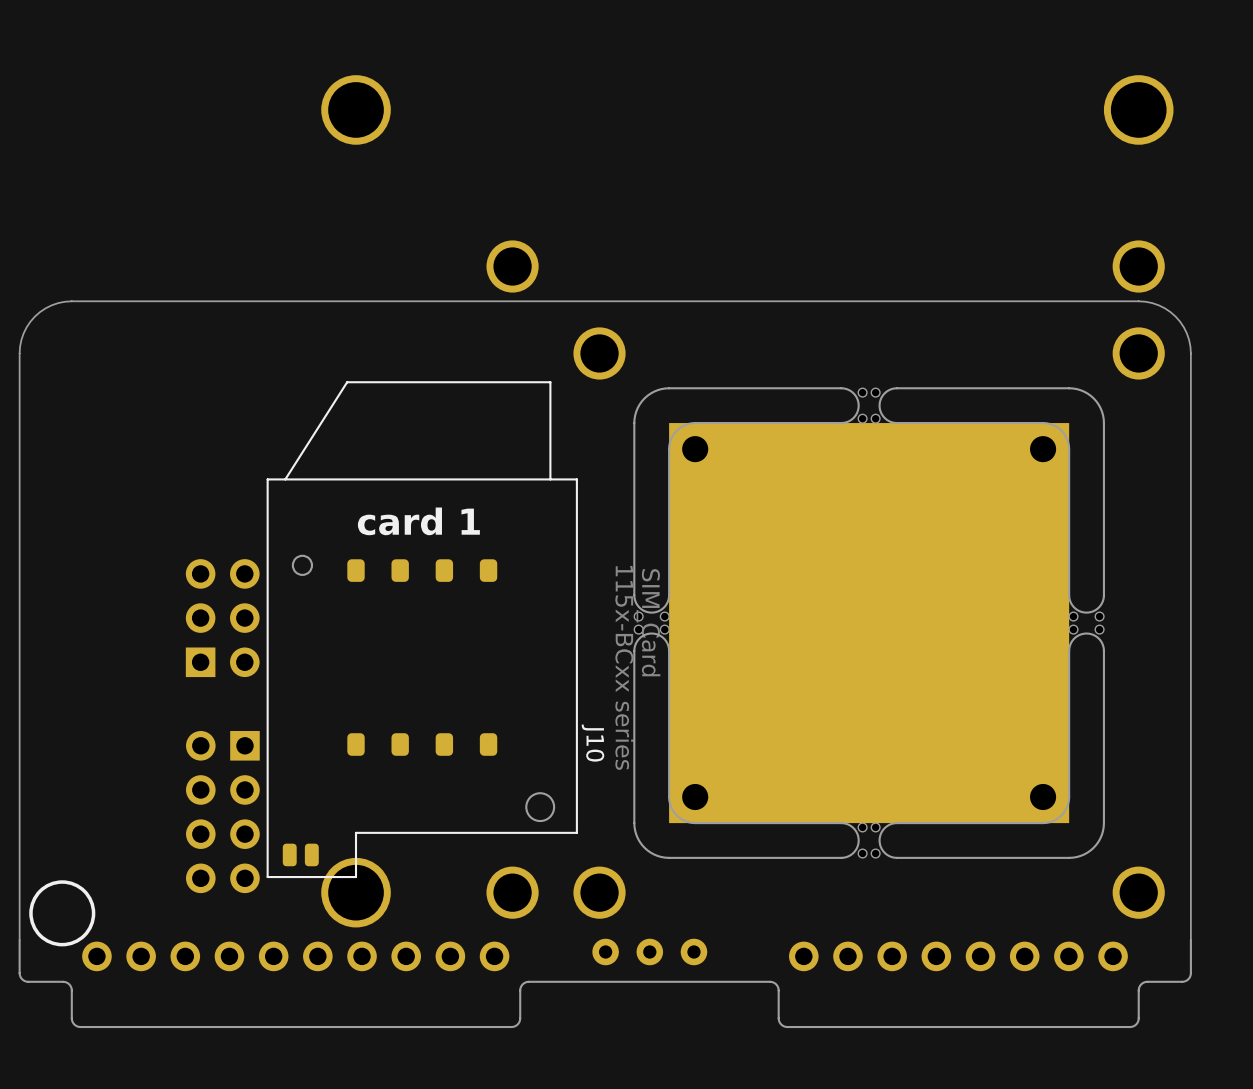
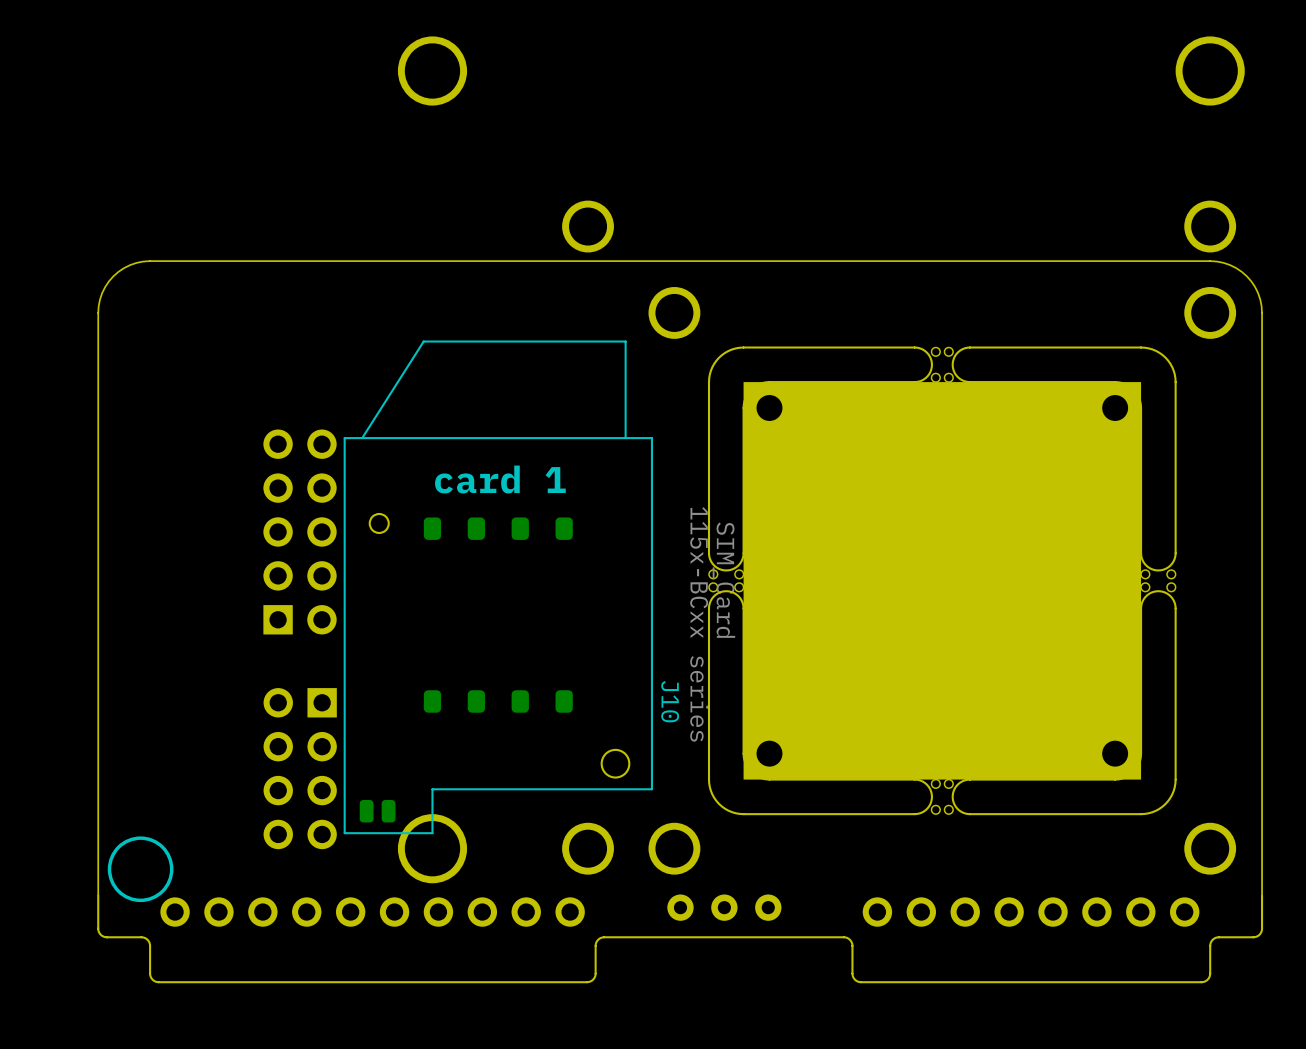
part: none -> (300, 531)

